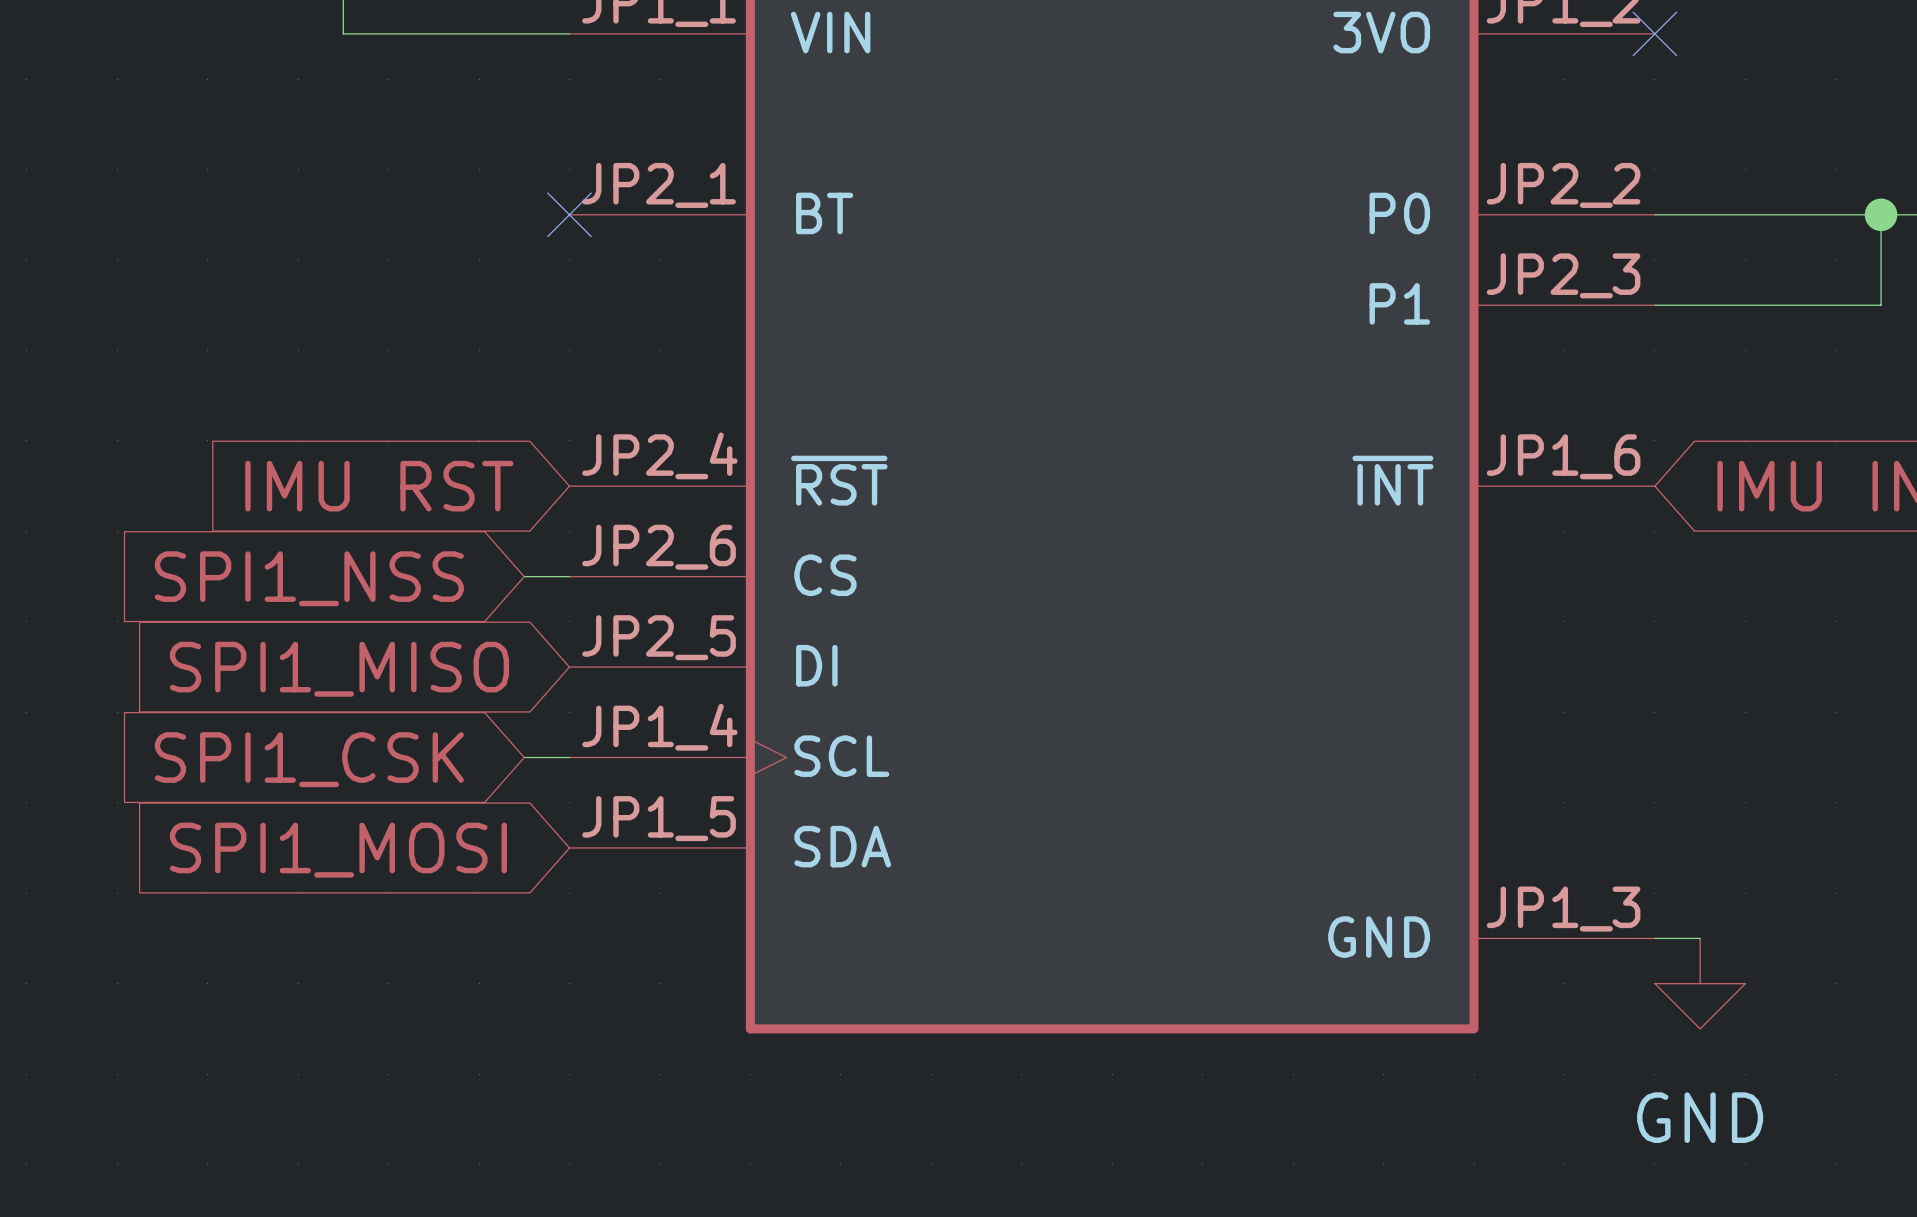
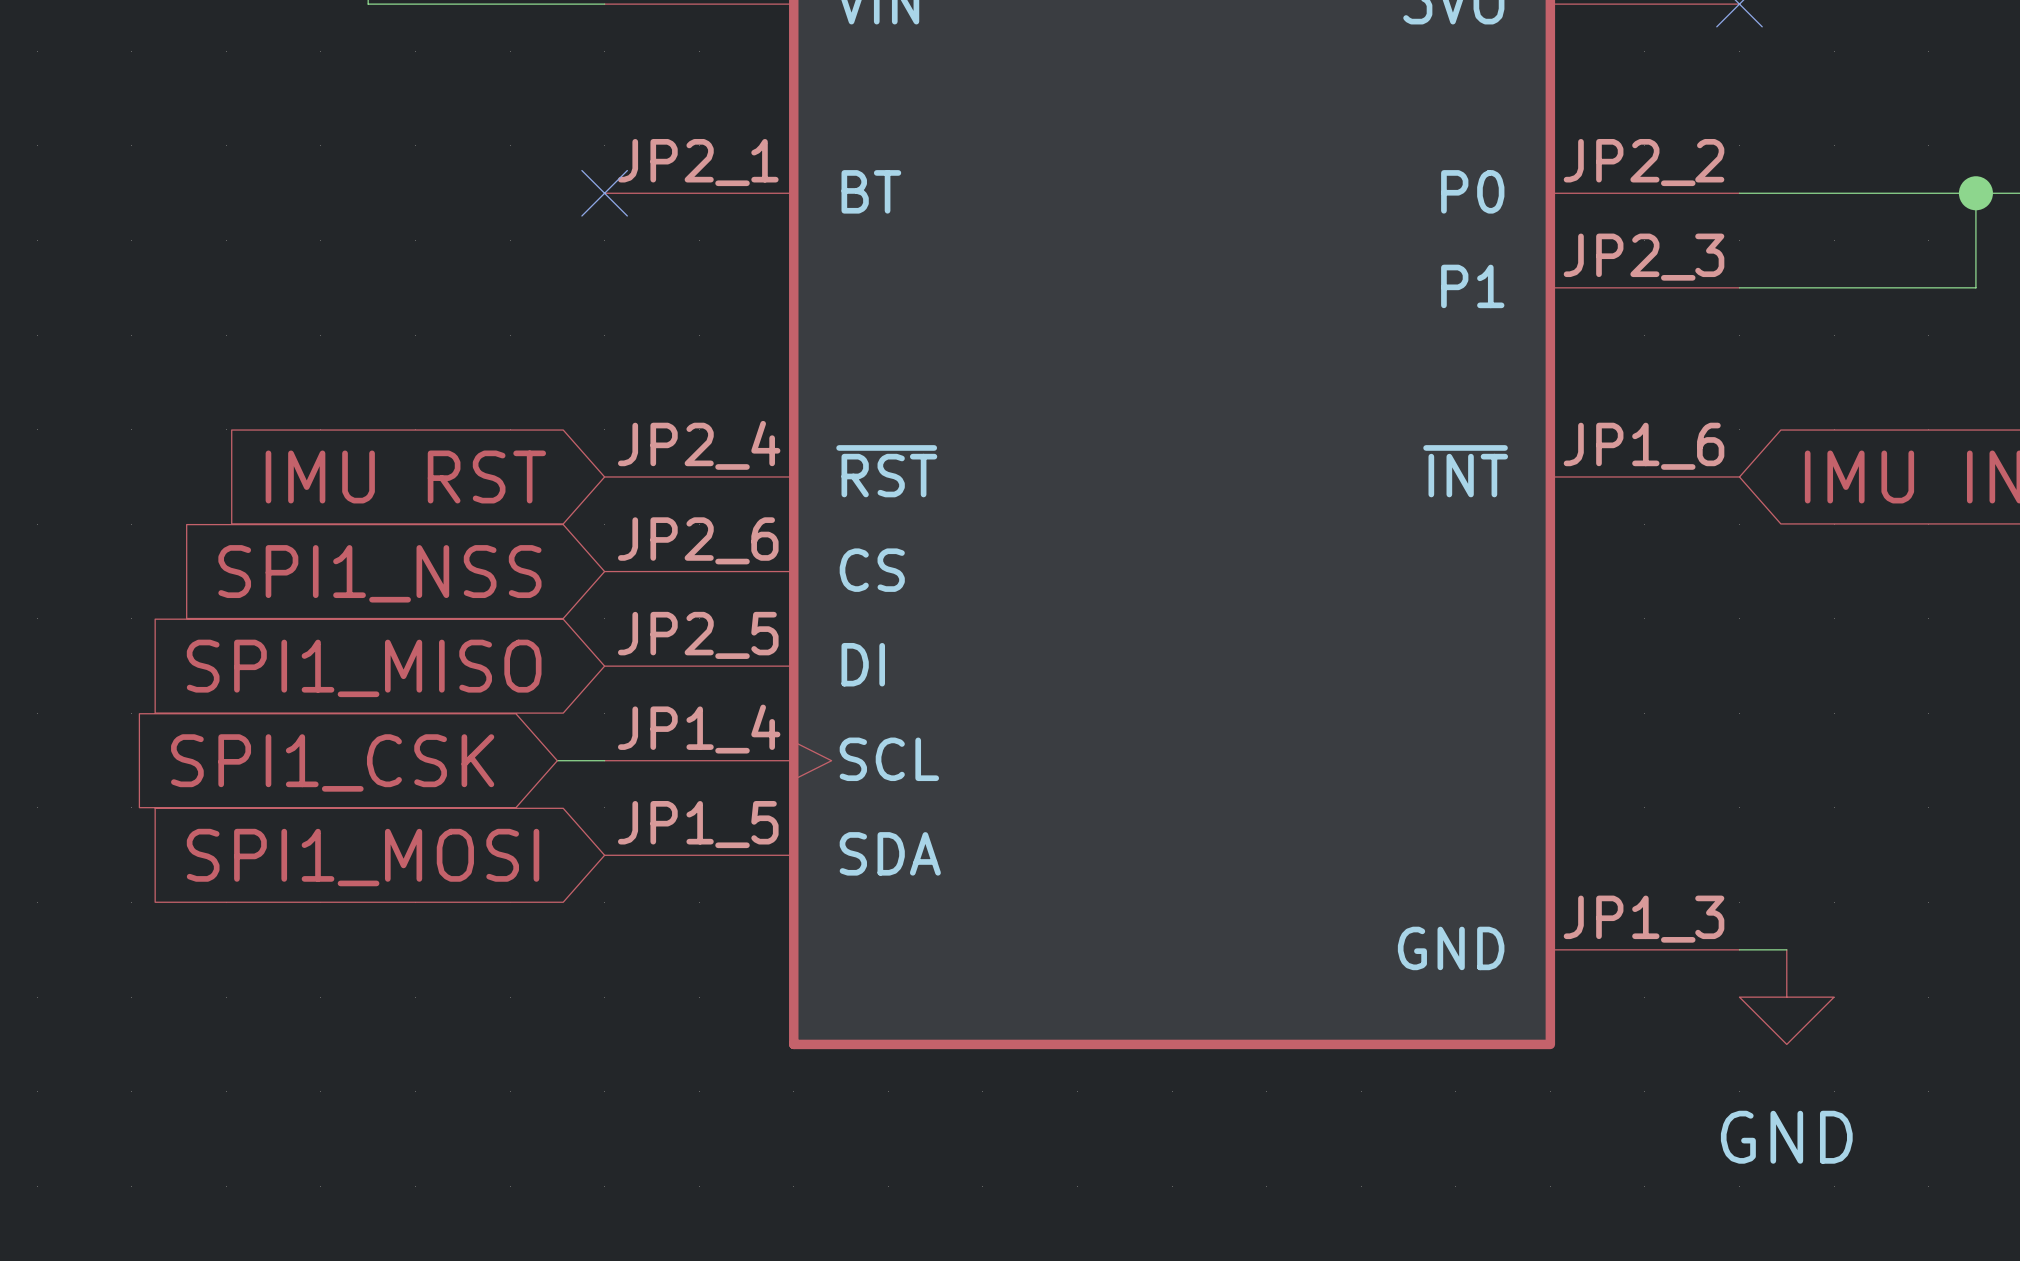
wire: (524, 576) (569, 576) -> none
global label position: SPI1_NSS (309, 578) -> SPI1_NSS (379, 573)

